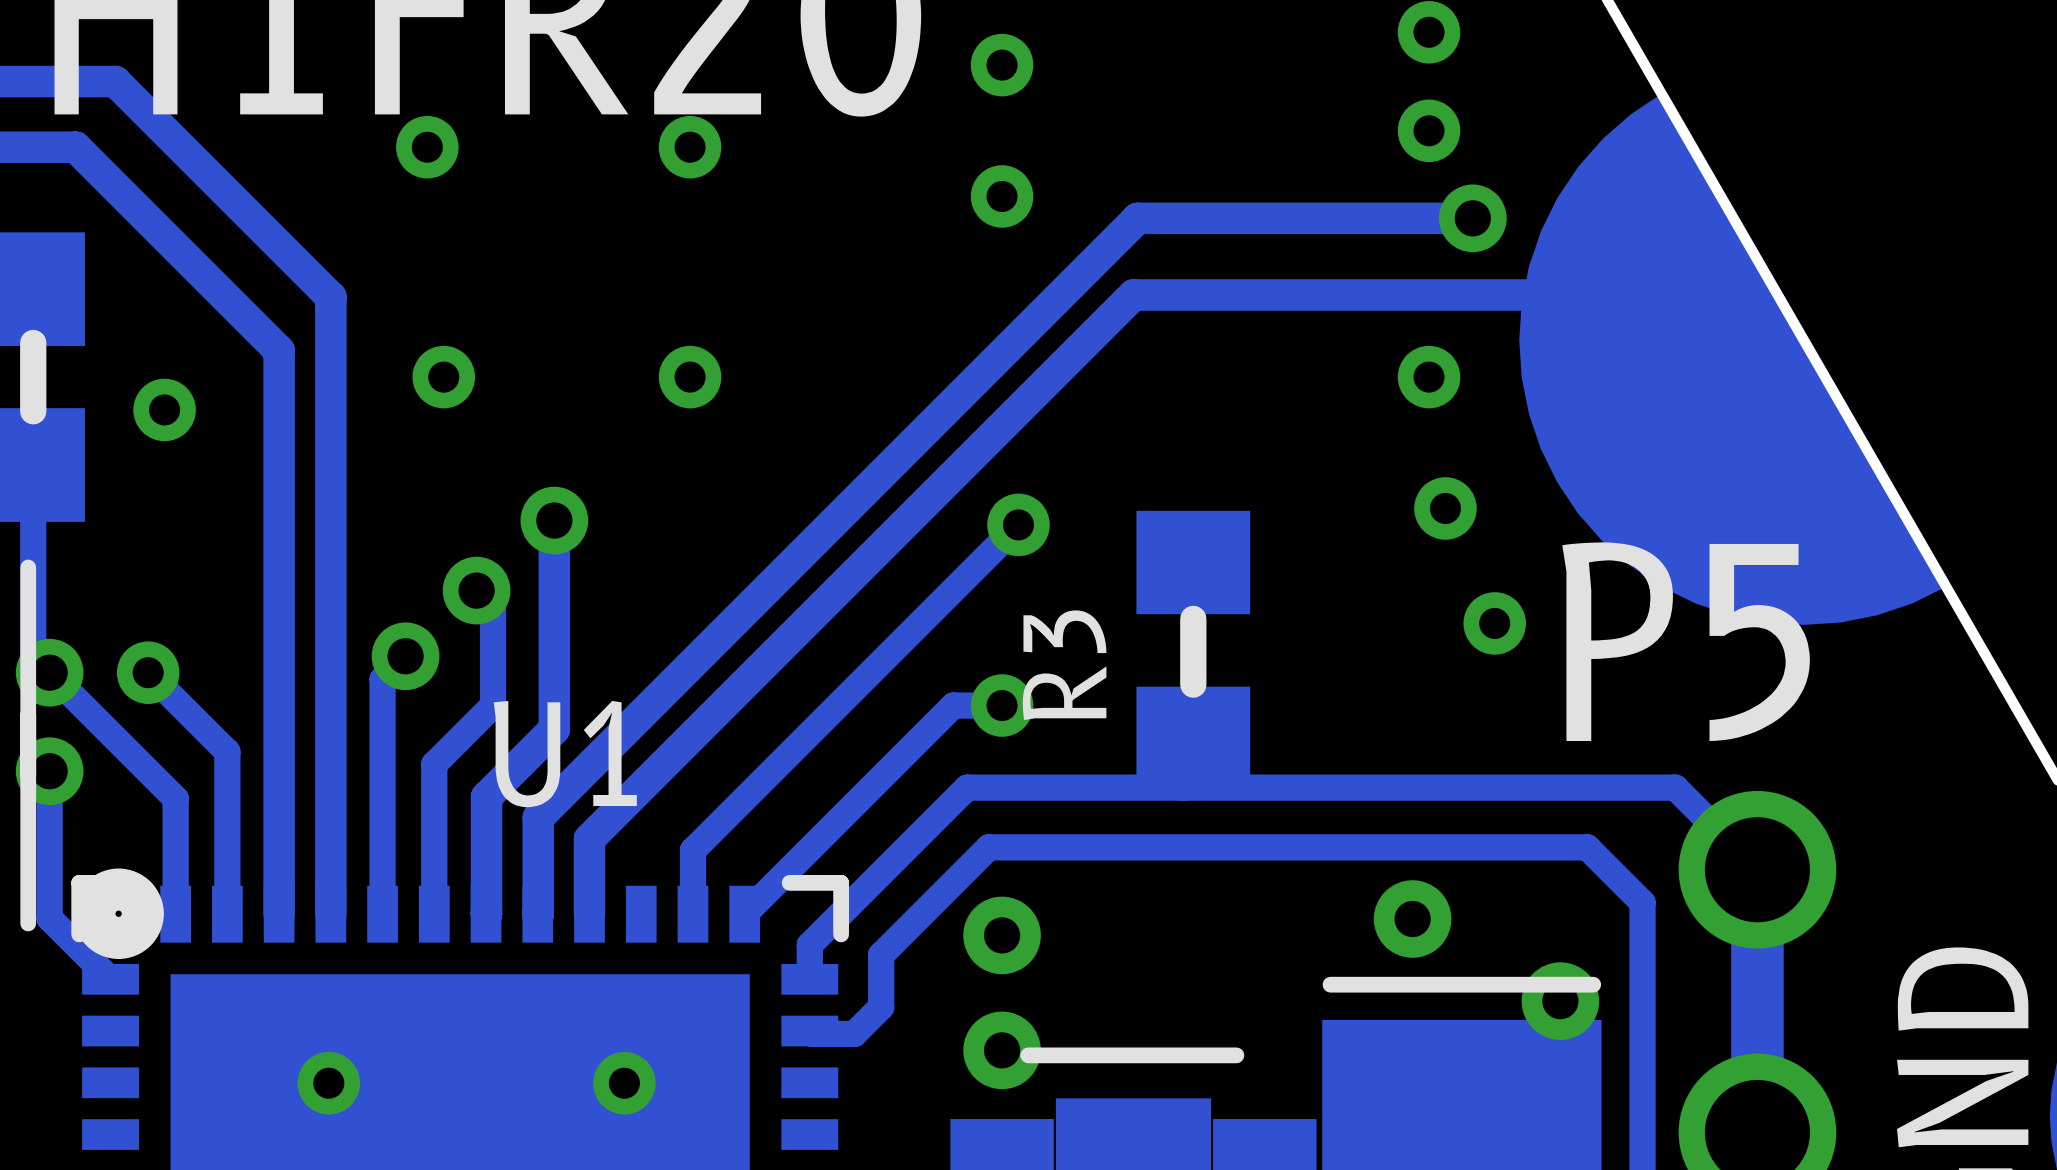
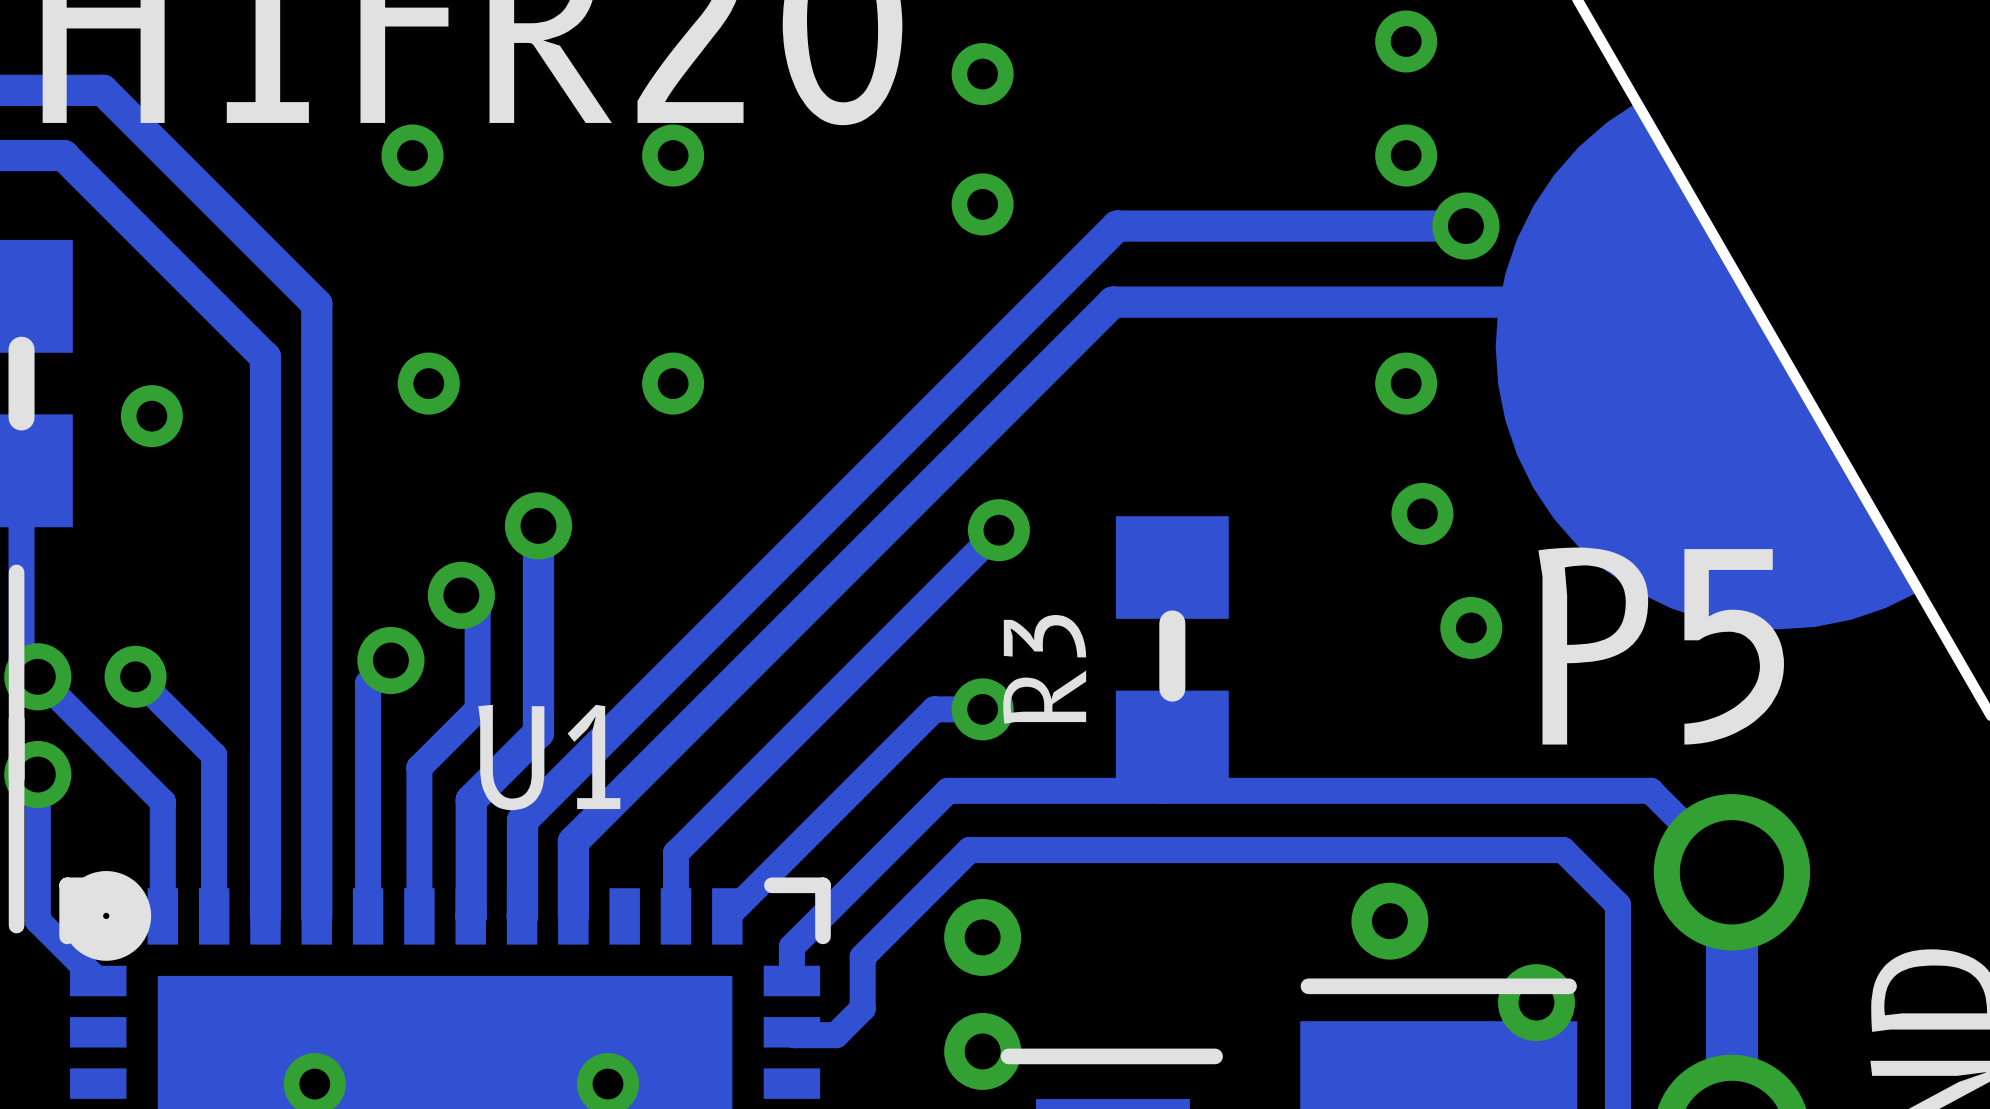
via position: (1429, 130) -> (1406, 155)
via position: (1472, 218) -> (1465, 226)

